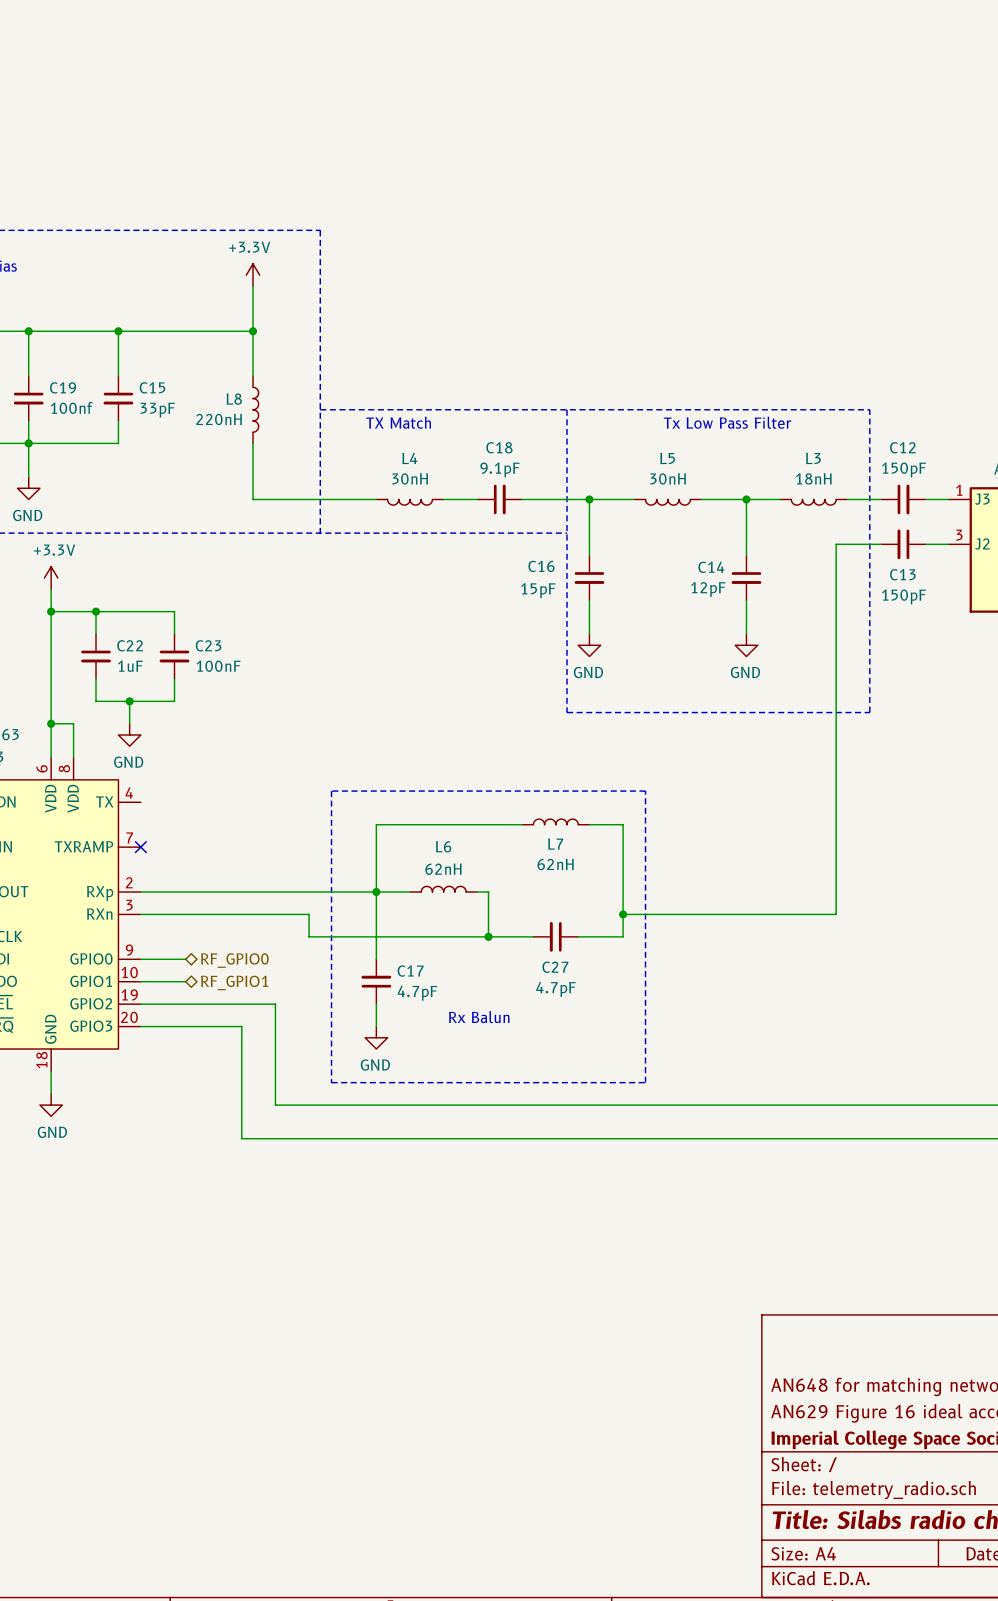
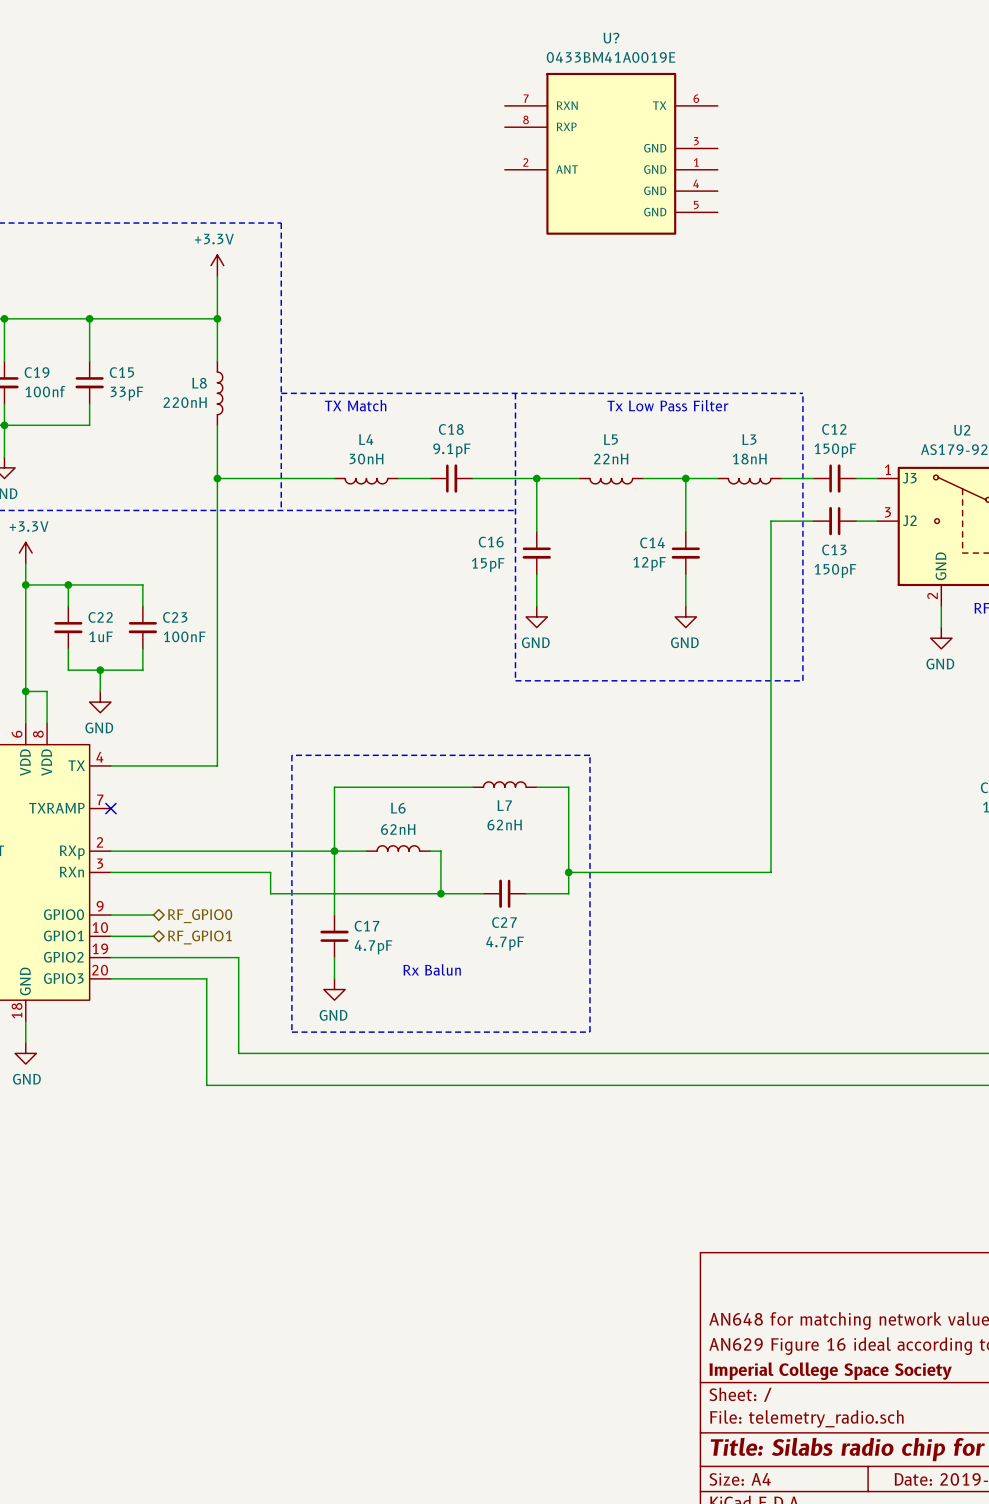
U?: none -> 0433BM41A0019E (611, 153)
L5 value: 30nH (668, 478) -> 22nH (611, 458)
wire: none -> (217, 478) (217, 765) (110, 765)
junction: none -> (217, 478)

